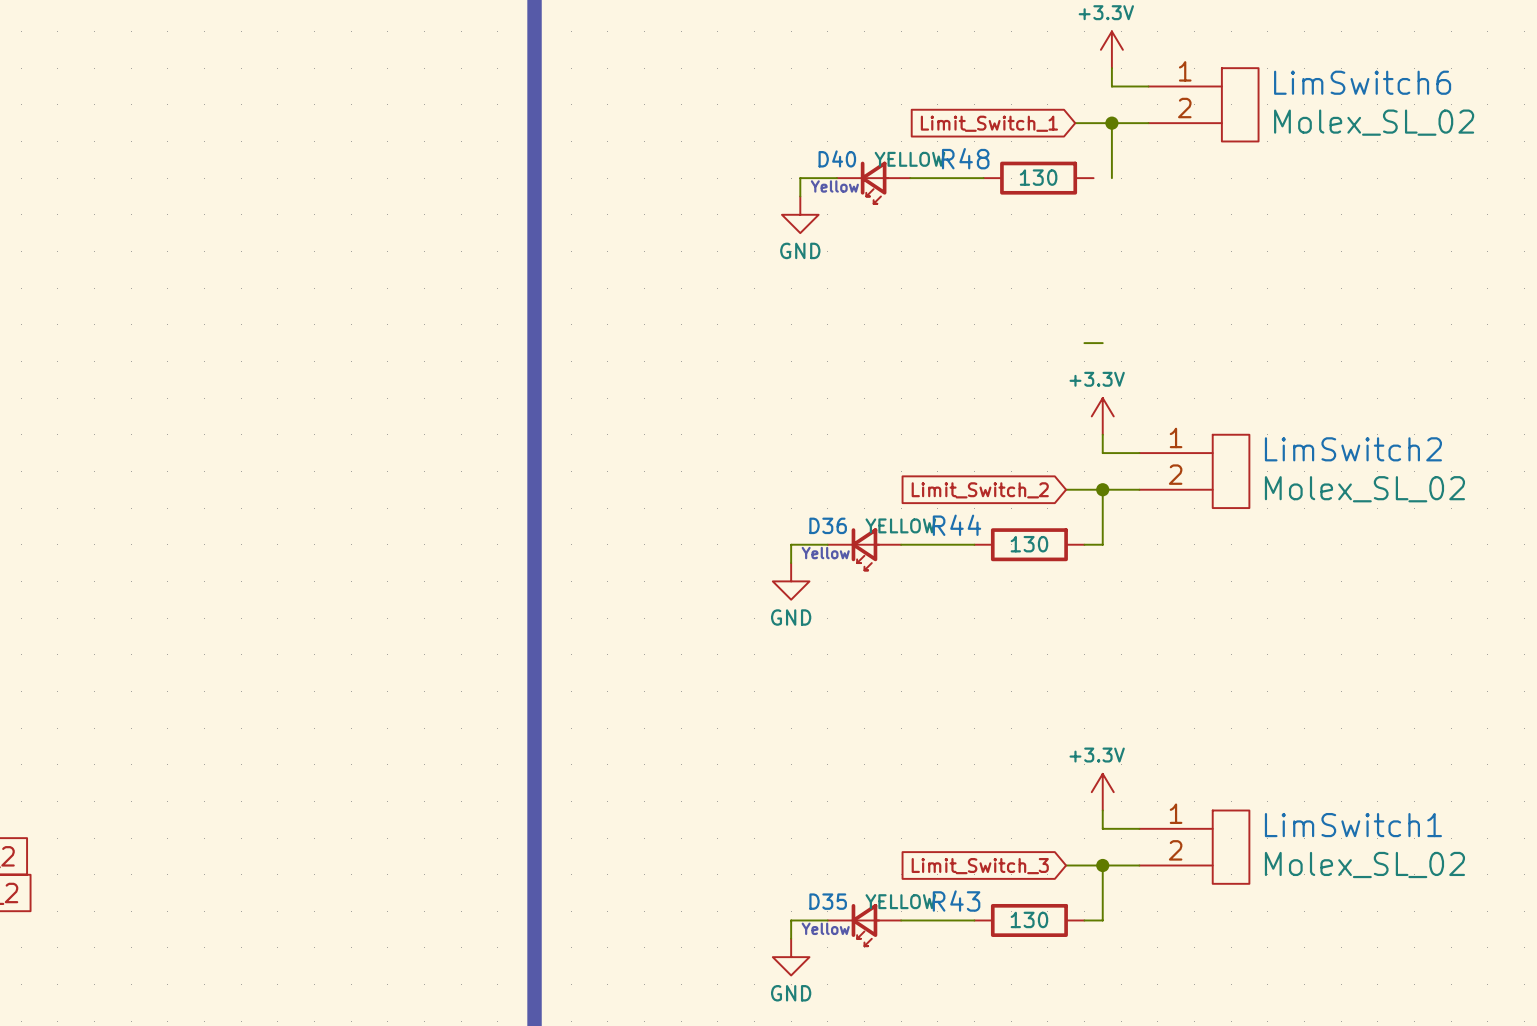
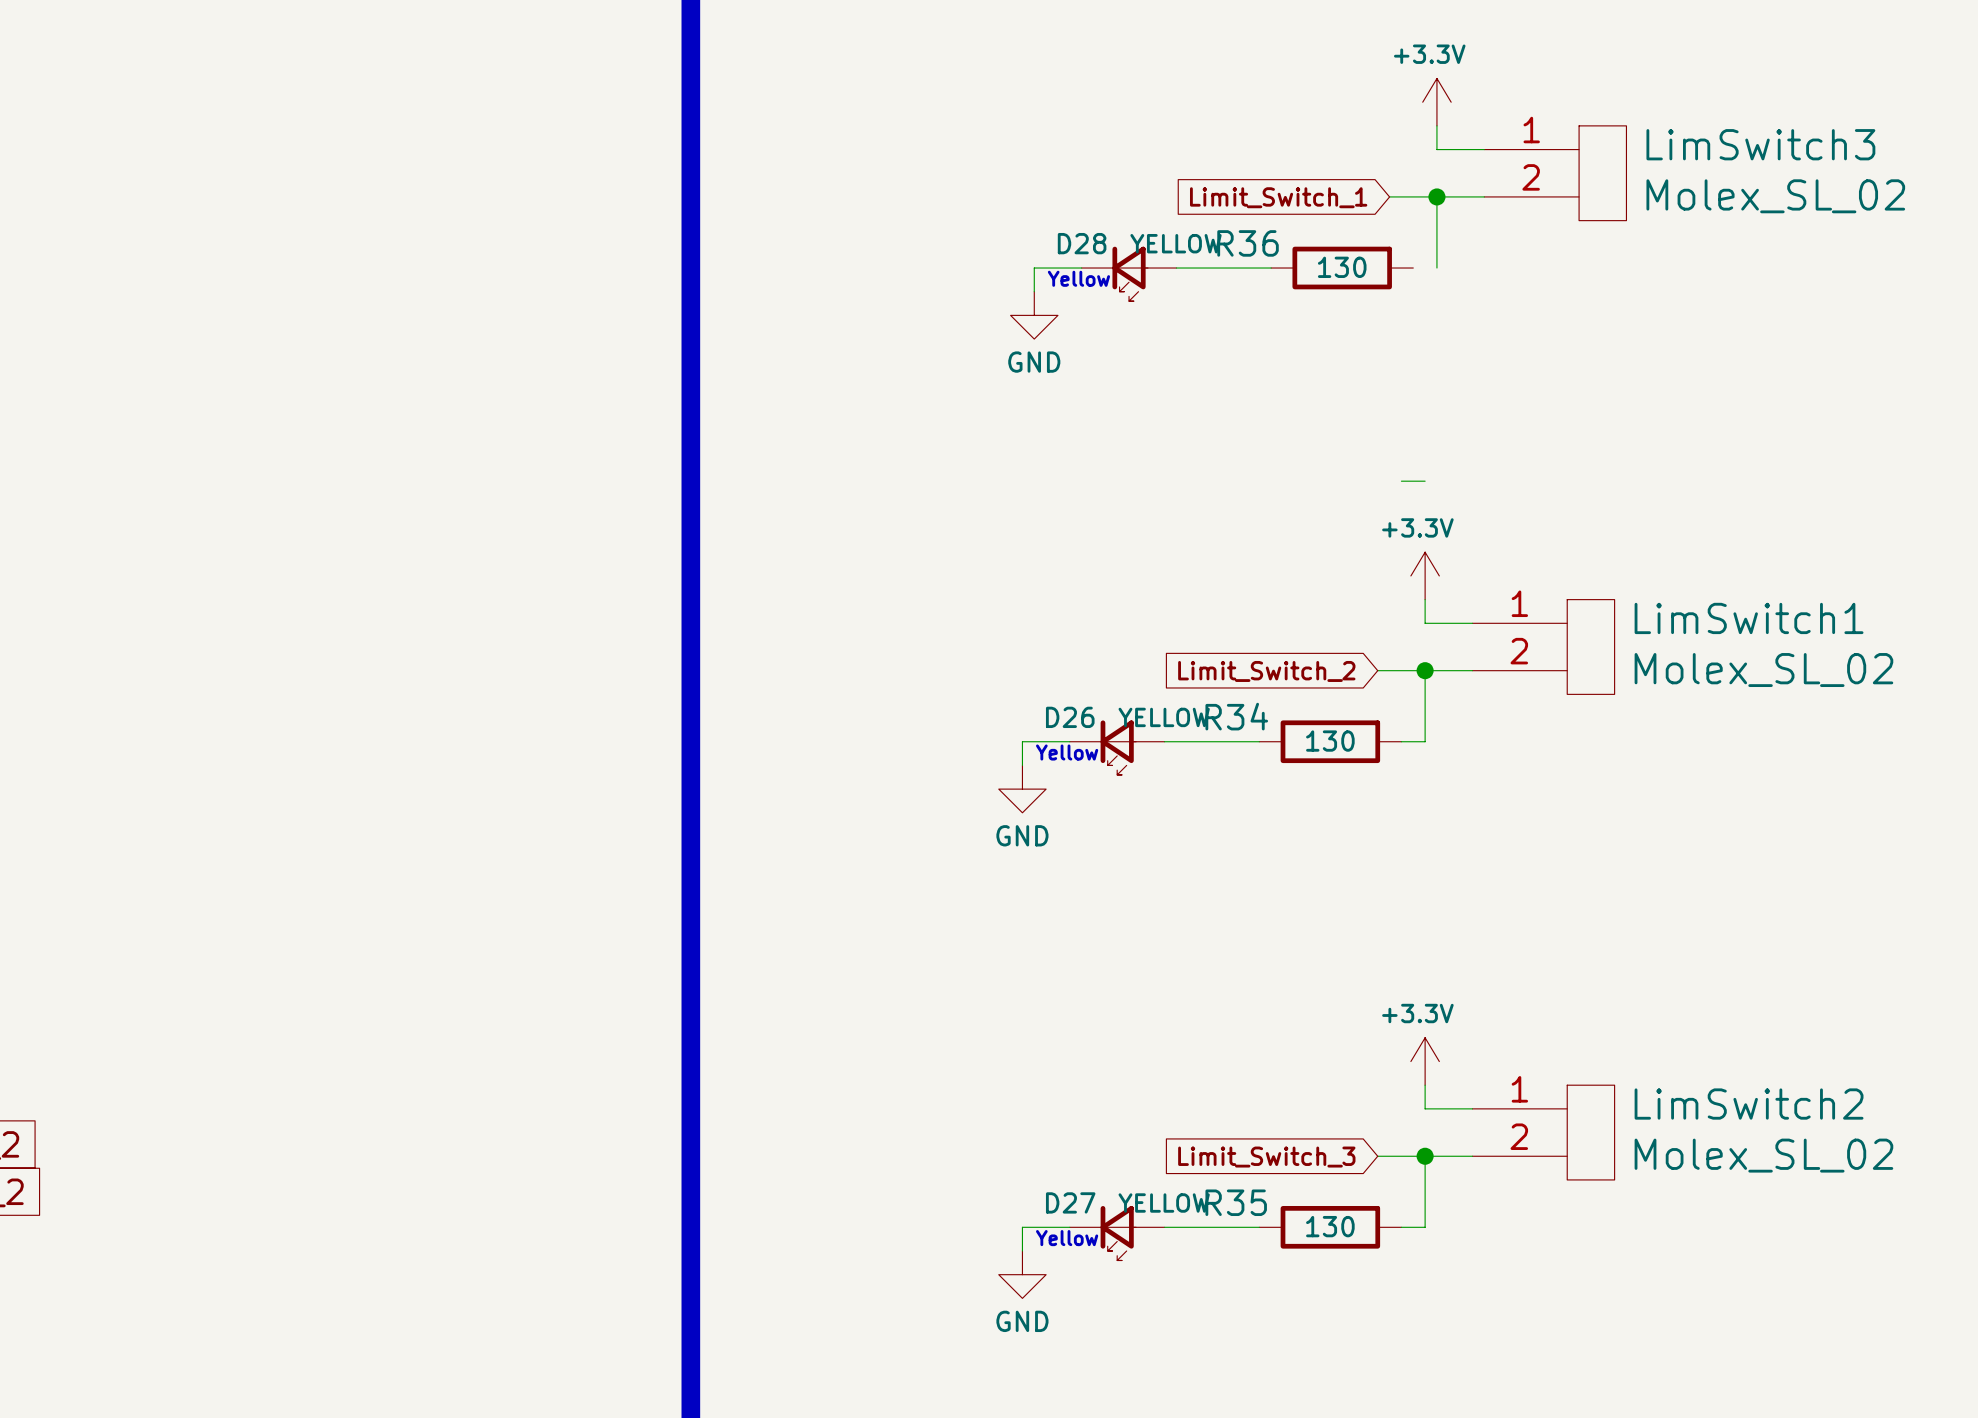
LimSwitch6 name: LimSwitch6 (1362, 82) -> LimSwitch3 (1760, 144)
D40 name: D40 (837, 158) -> D28 (1082, 243)
R48 name: R48 (965, 158) -> R36 (1248, 243)
LimSwitch2 name: LimSwitch2 (1353, 449) -> LimSwitch1 (1749, 618)
D36 name: D36 (828, 525) -> D26 (1070, 717)
R44 name: R44 (956, 525) -> R34 (1236, 716)
LimSwitch1 name: LimSwitch1 (1353, 825) -> LimSwitch2 (1749, 1104)
D35 name: D35 (828, 901) -> D27 (1070, 1202)
R43 name: R43 (956, 901) -> R35 (1236, 1202)

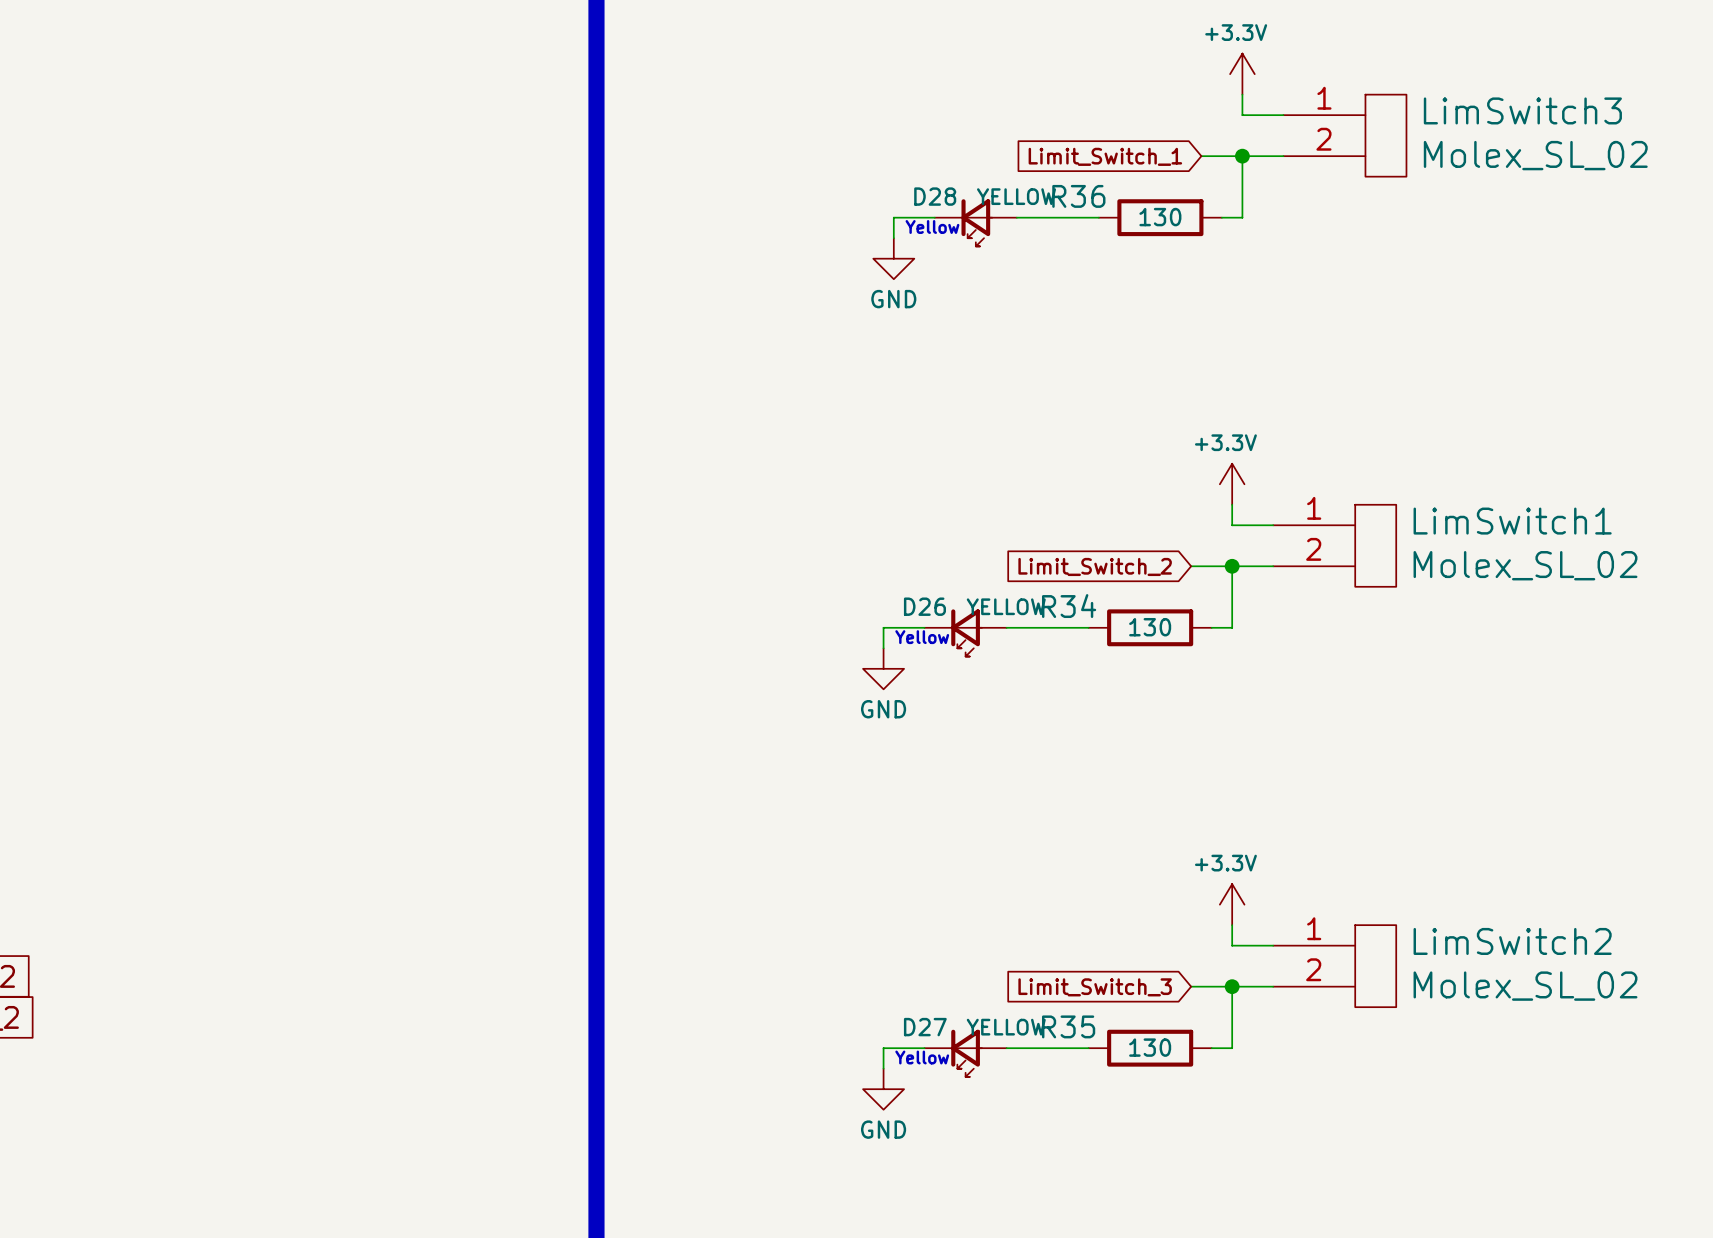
wire: (1401, 481) (1425, 481) -> (1221, 217) (1242, 217)

